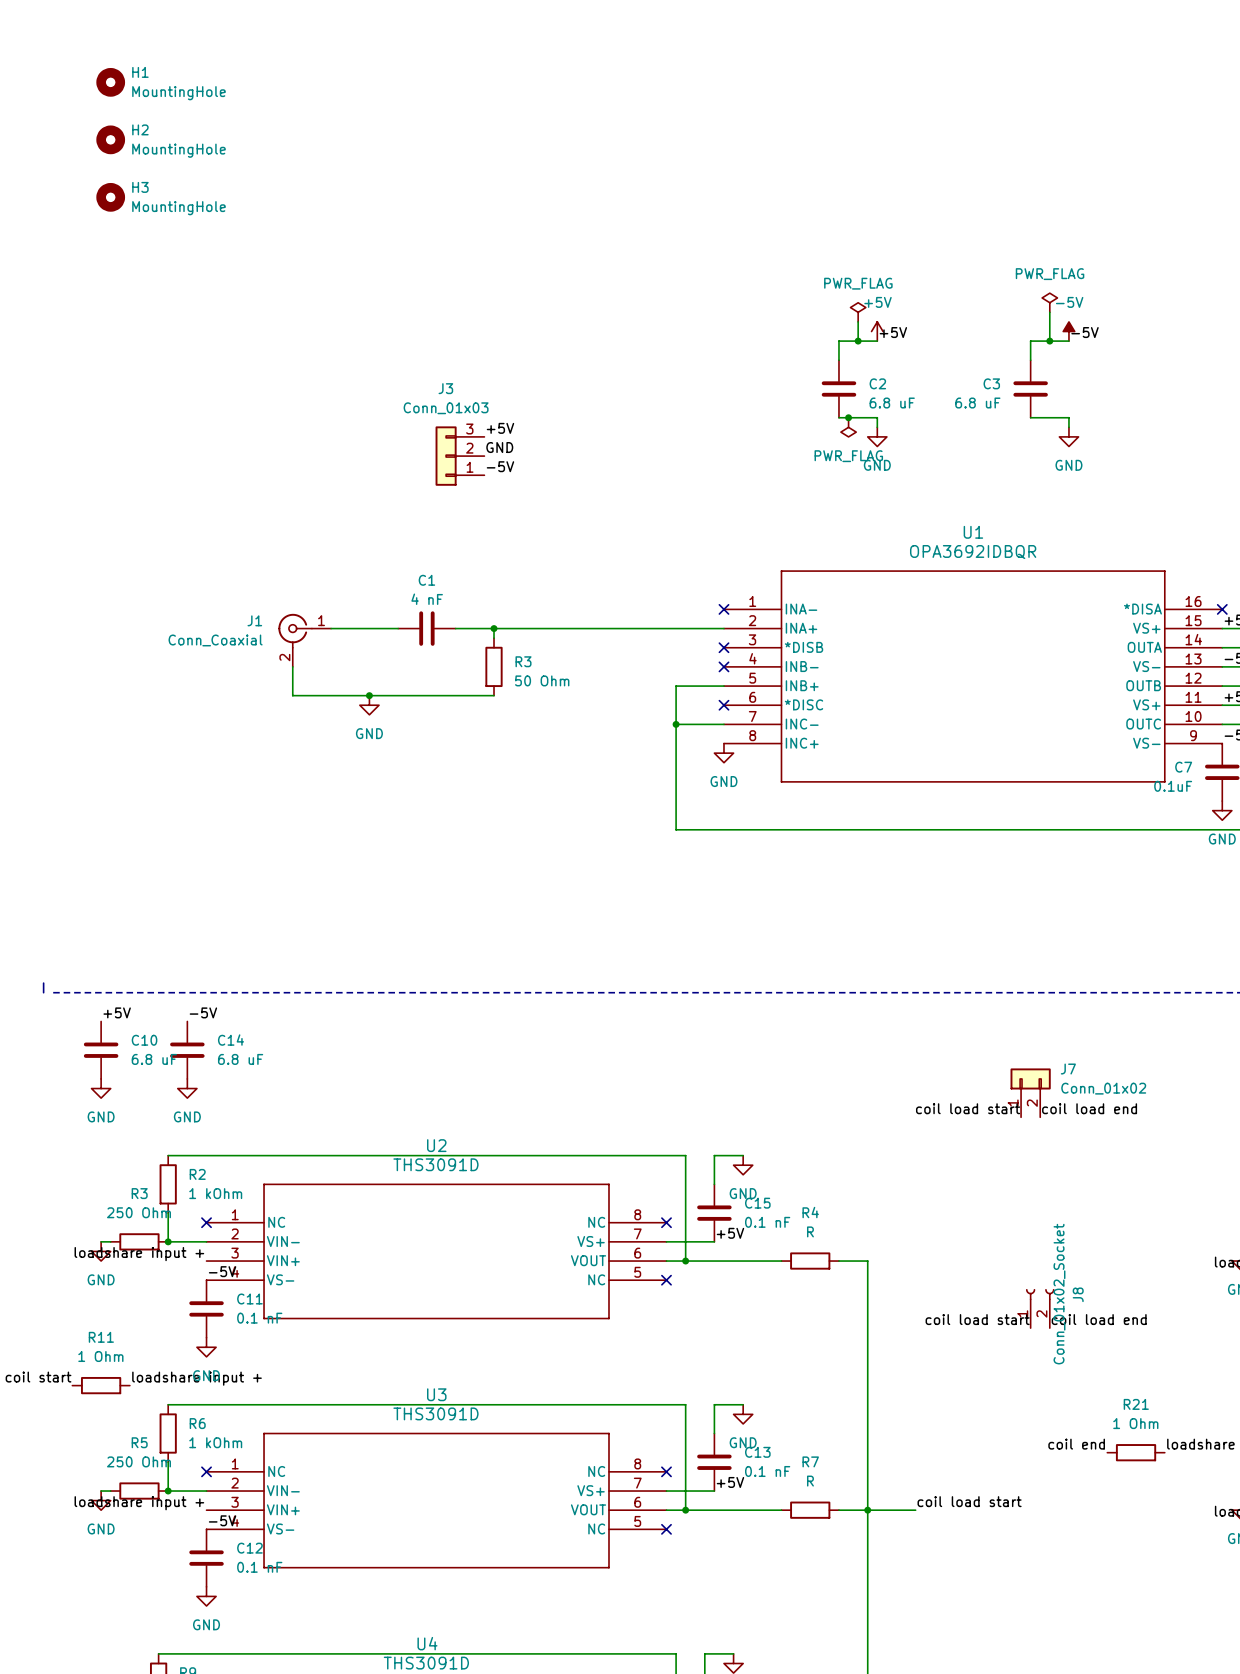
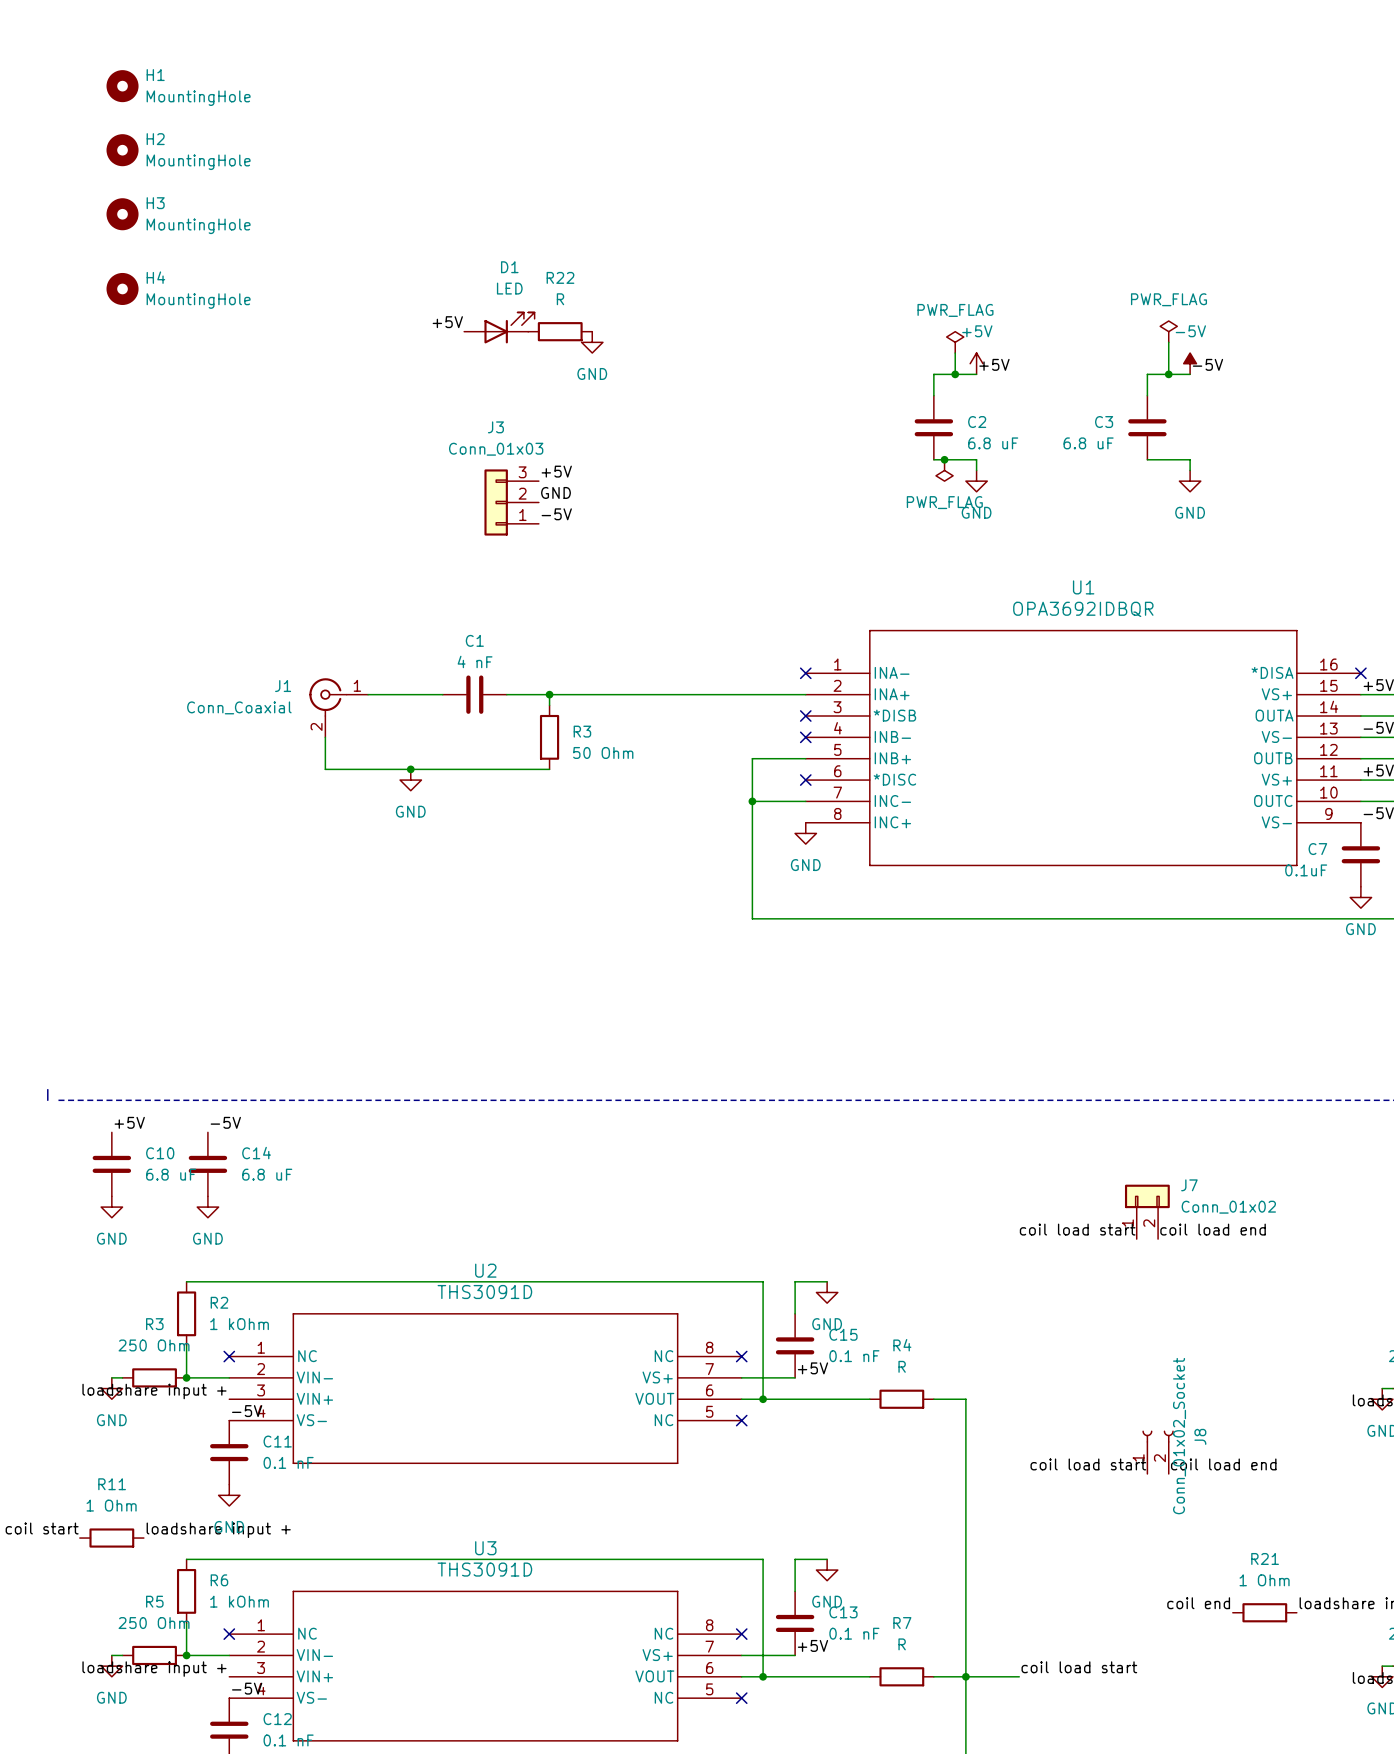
H4: none -> MountingHole (122, 288)
label: none -> +5V (447, 322)
D1: none -> LED (499, 327)
R22: none -> R (560, 331)
power symbol: none -> GND (592, 342)

